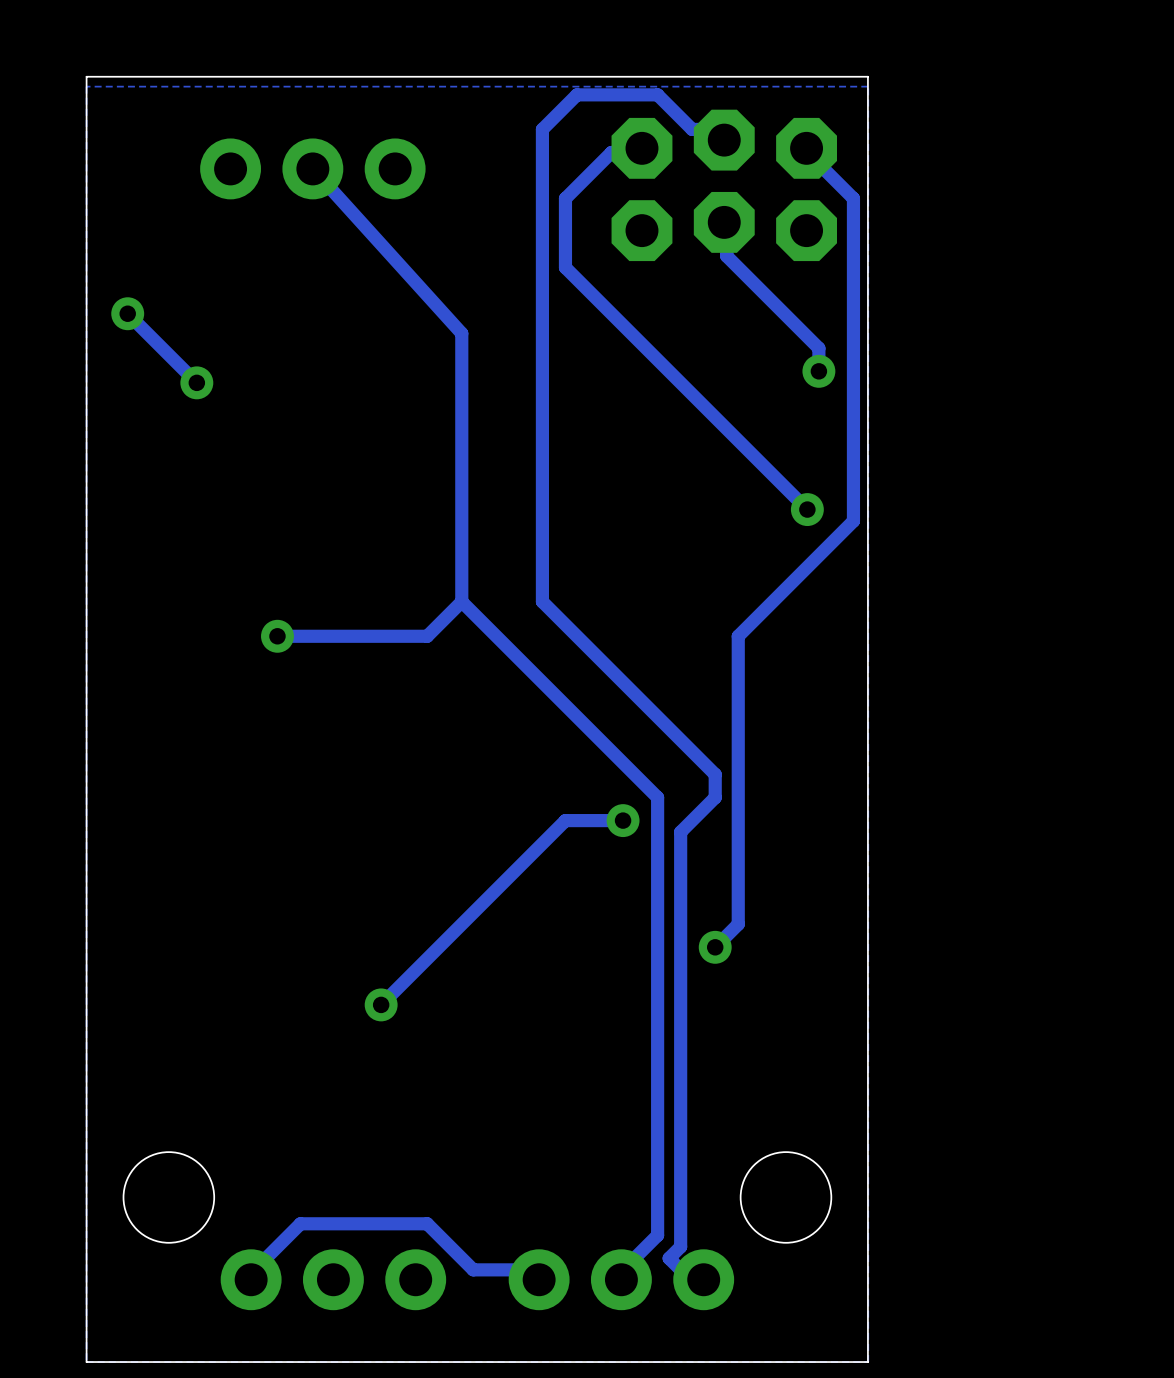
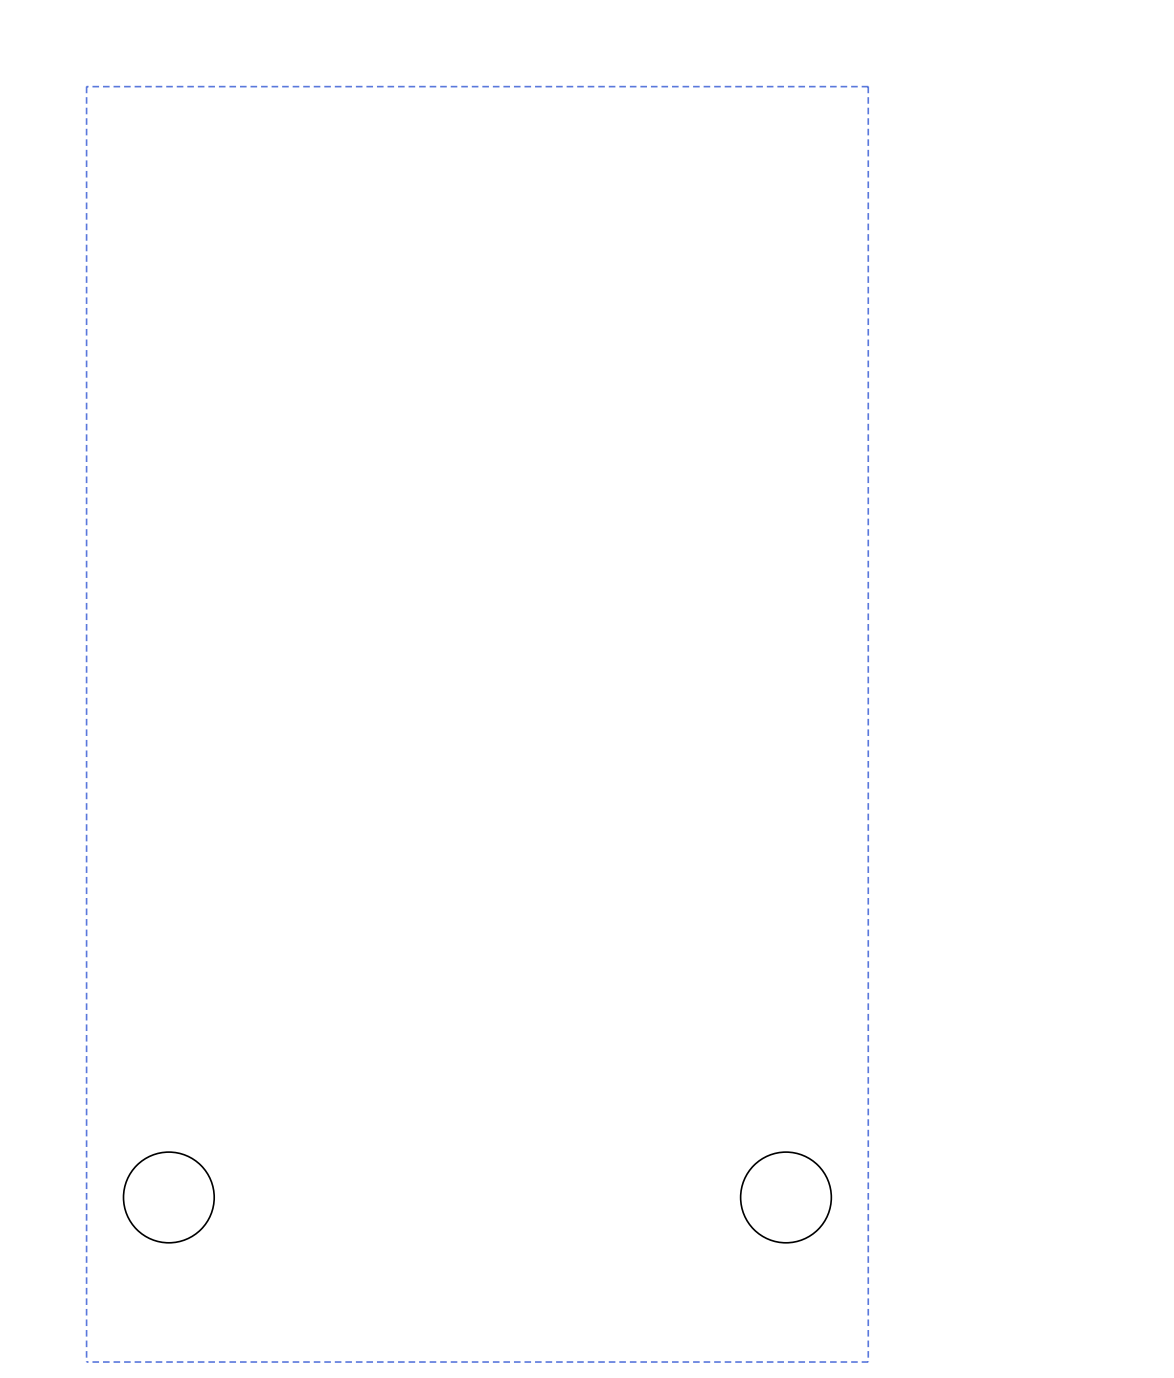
board edge: (867, 76) (86, 76) (86, 1362) (867, 1362) (867, 76) -> none
track: (724, 140) (715, 129) (692, 129) (657, 94) (576, 94) (542, 129) (542, 601) (715, 774) (715, 797) (680, 832) (680, 1246) (669, 1258) (680, 1269) (703, 1269) (703, 1279) -> none
track: (641, 148) (634, 152) (611, 152) (565, 198) (565, 267) (807, 509) -> none
track: (806, 148) (807, 152) (853, 198) (853, 521) (738, 636) (738, 924) (715, 947) -> none
track: (312, 168) (461, 333) (461, 601) -> none
part: (312, 168) -> none
part: (724, 185) -> none
track: (724, 222) (726, 233) (726, 256) (818, 348) (818, 371) -> none
track: (127, 313) (196, 382) -> none
via: (127, 313) -> none
via: (818, 371) -> none
via: (196, 382) -> none
via: (807, 509) -> none
track: (461, 601) (657, 797) (657, 1235) (623, 1269) (621, 1279) -> none
track: (461, 601) (427, 636) (277, 636) -> none
via: (277, 636) -> none
track: (623, 820) (565, 820) (381, 1004) -> none
via: (623, 820) -> none
via: (715, 947) -> none
via: (381, 1004) -> none
part: (333, 1279) -> none
track: (539, 1279) (530, 1269) (473, 1269) (427, 1223) (300, 1223) (254, 1269) (251, 1279) -> none
part: (621, 1279) -> none

